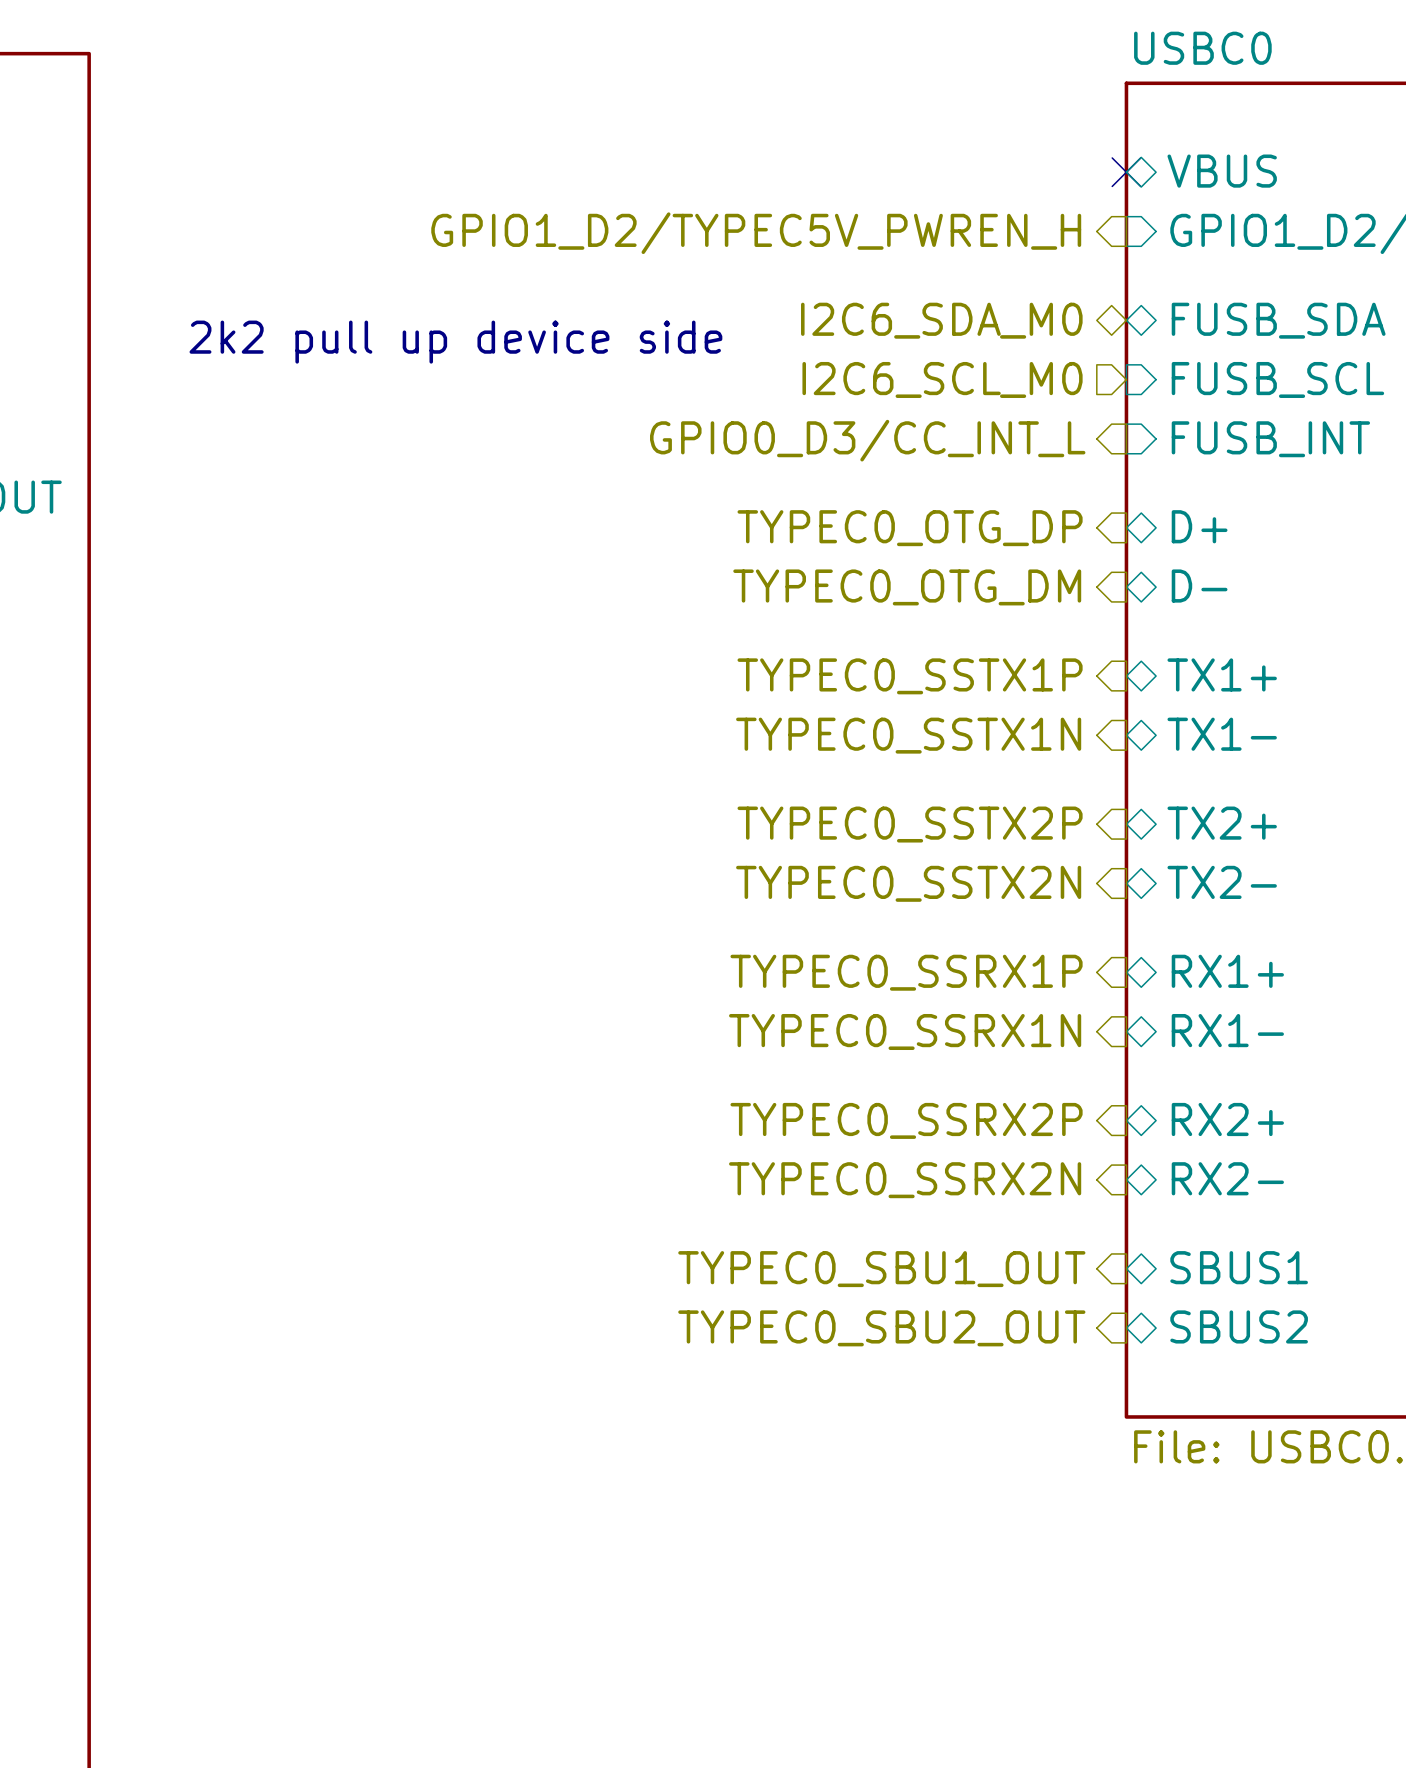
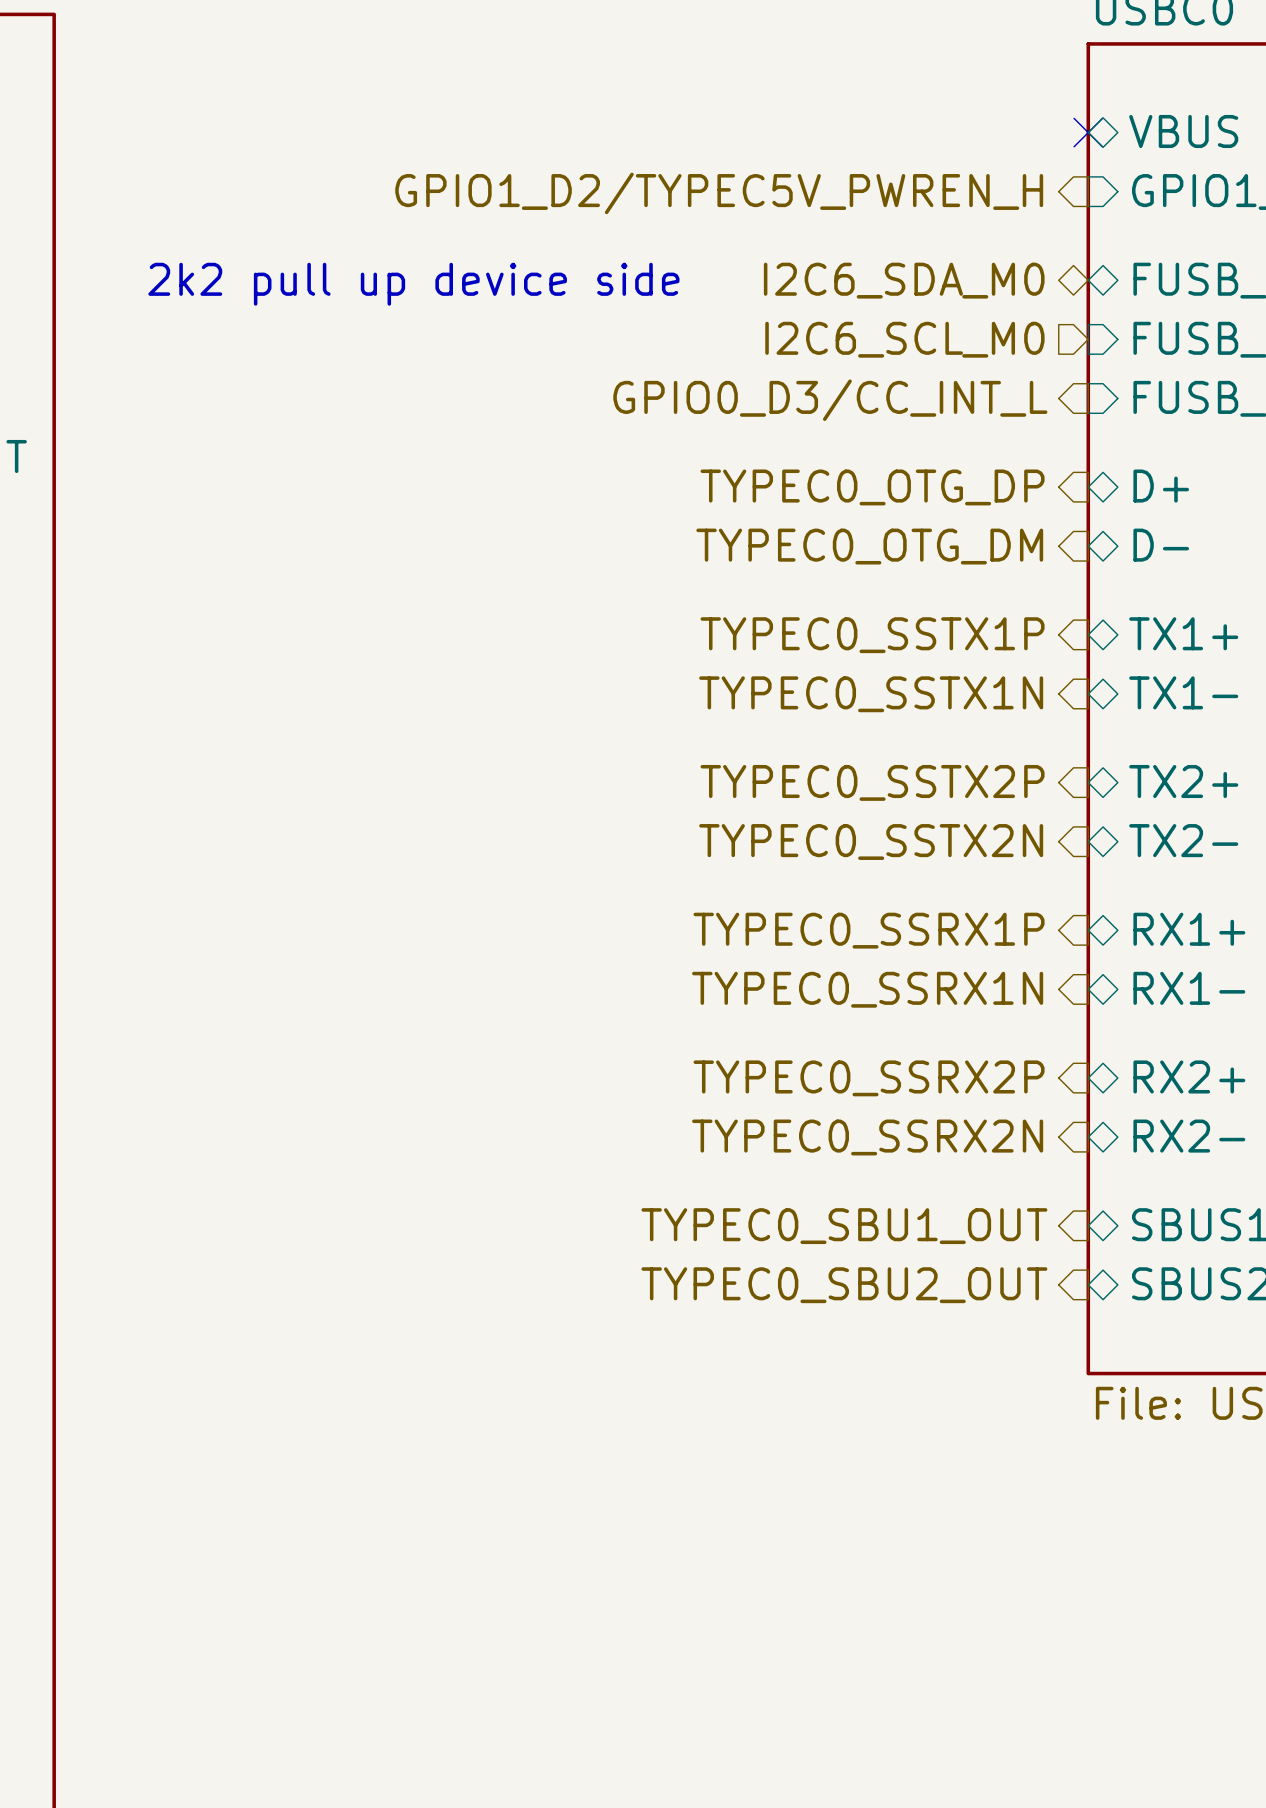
text position: 2k2 pull up device side (455, 342) -> 2k2 pull up device side (413, 284)

